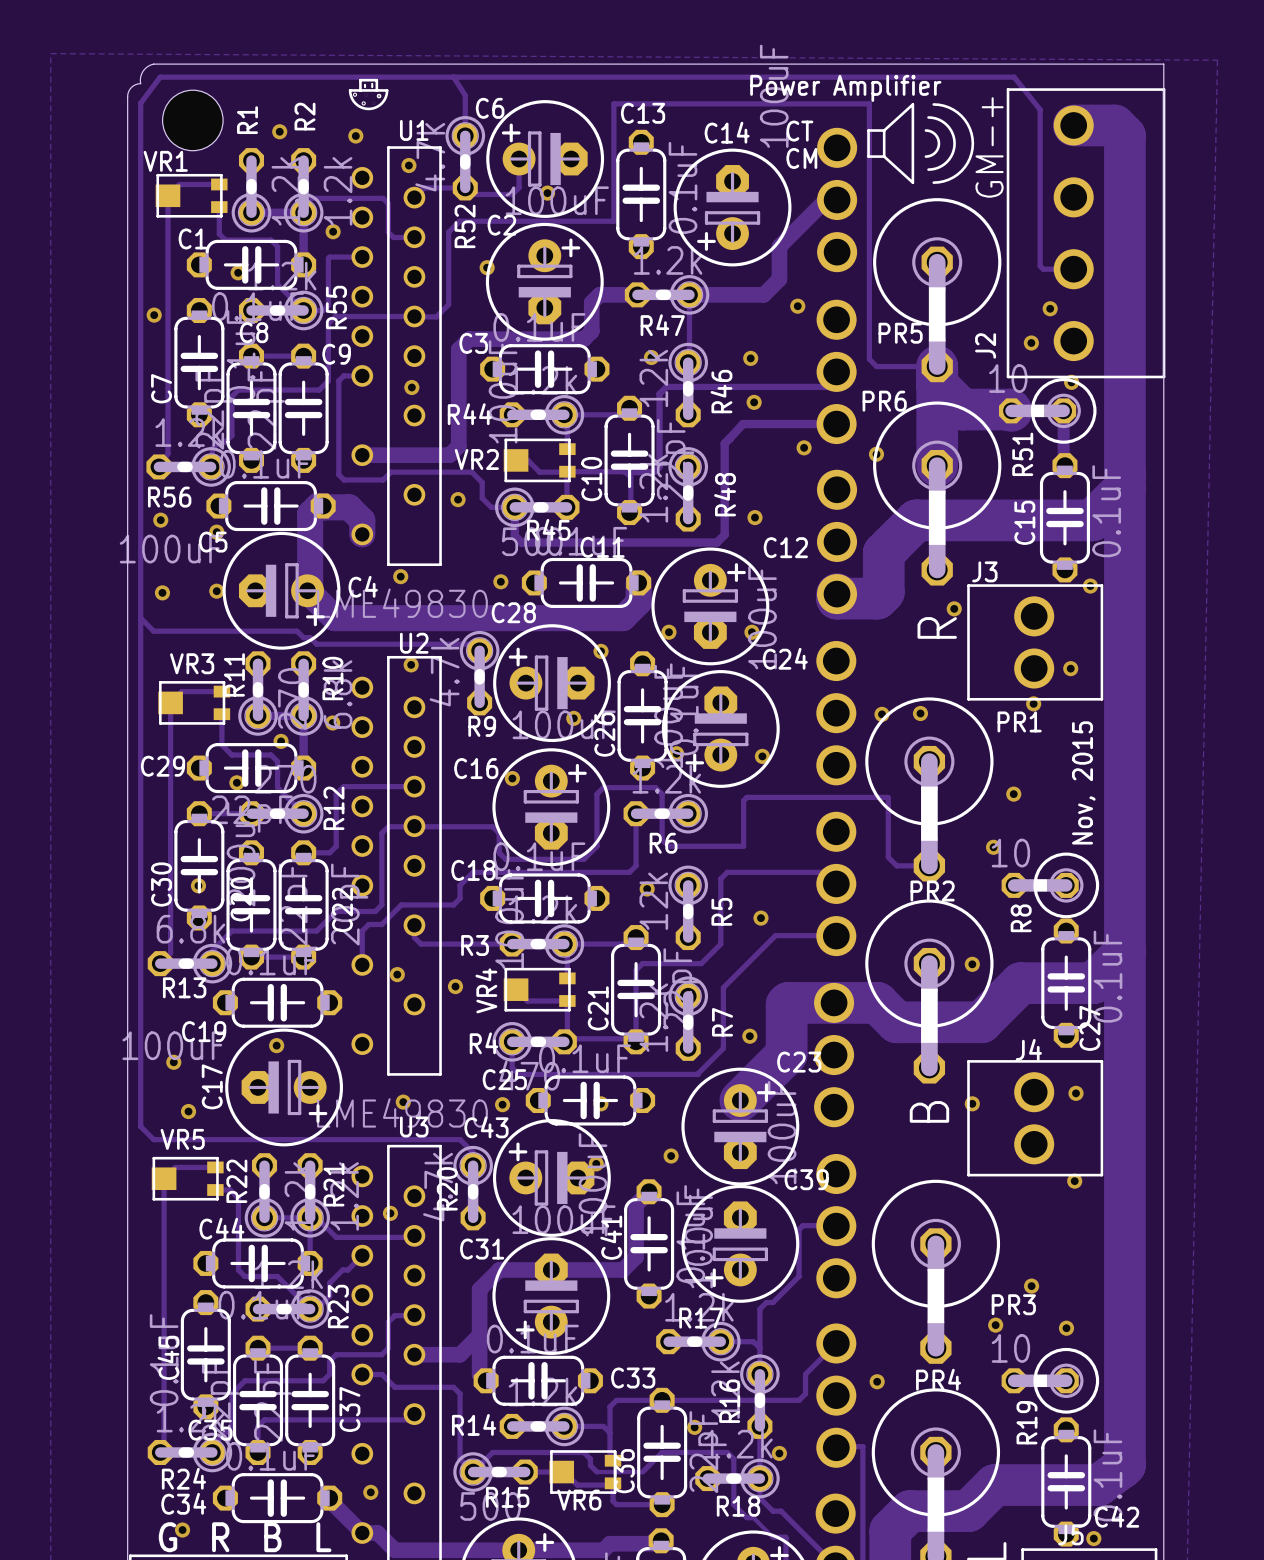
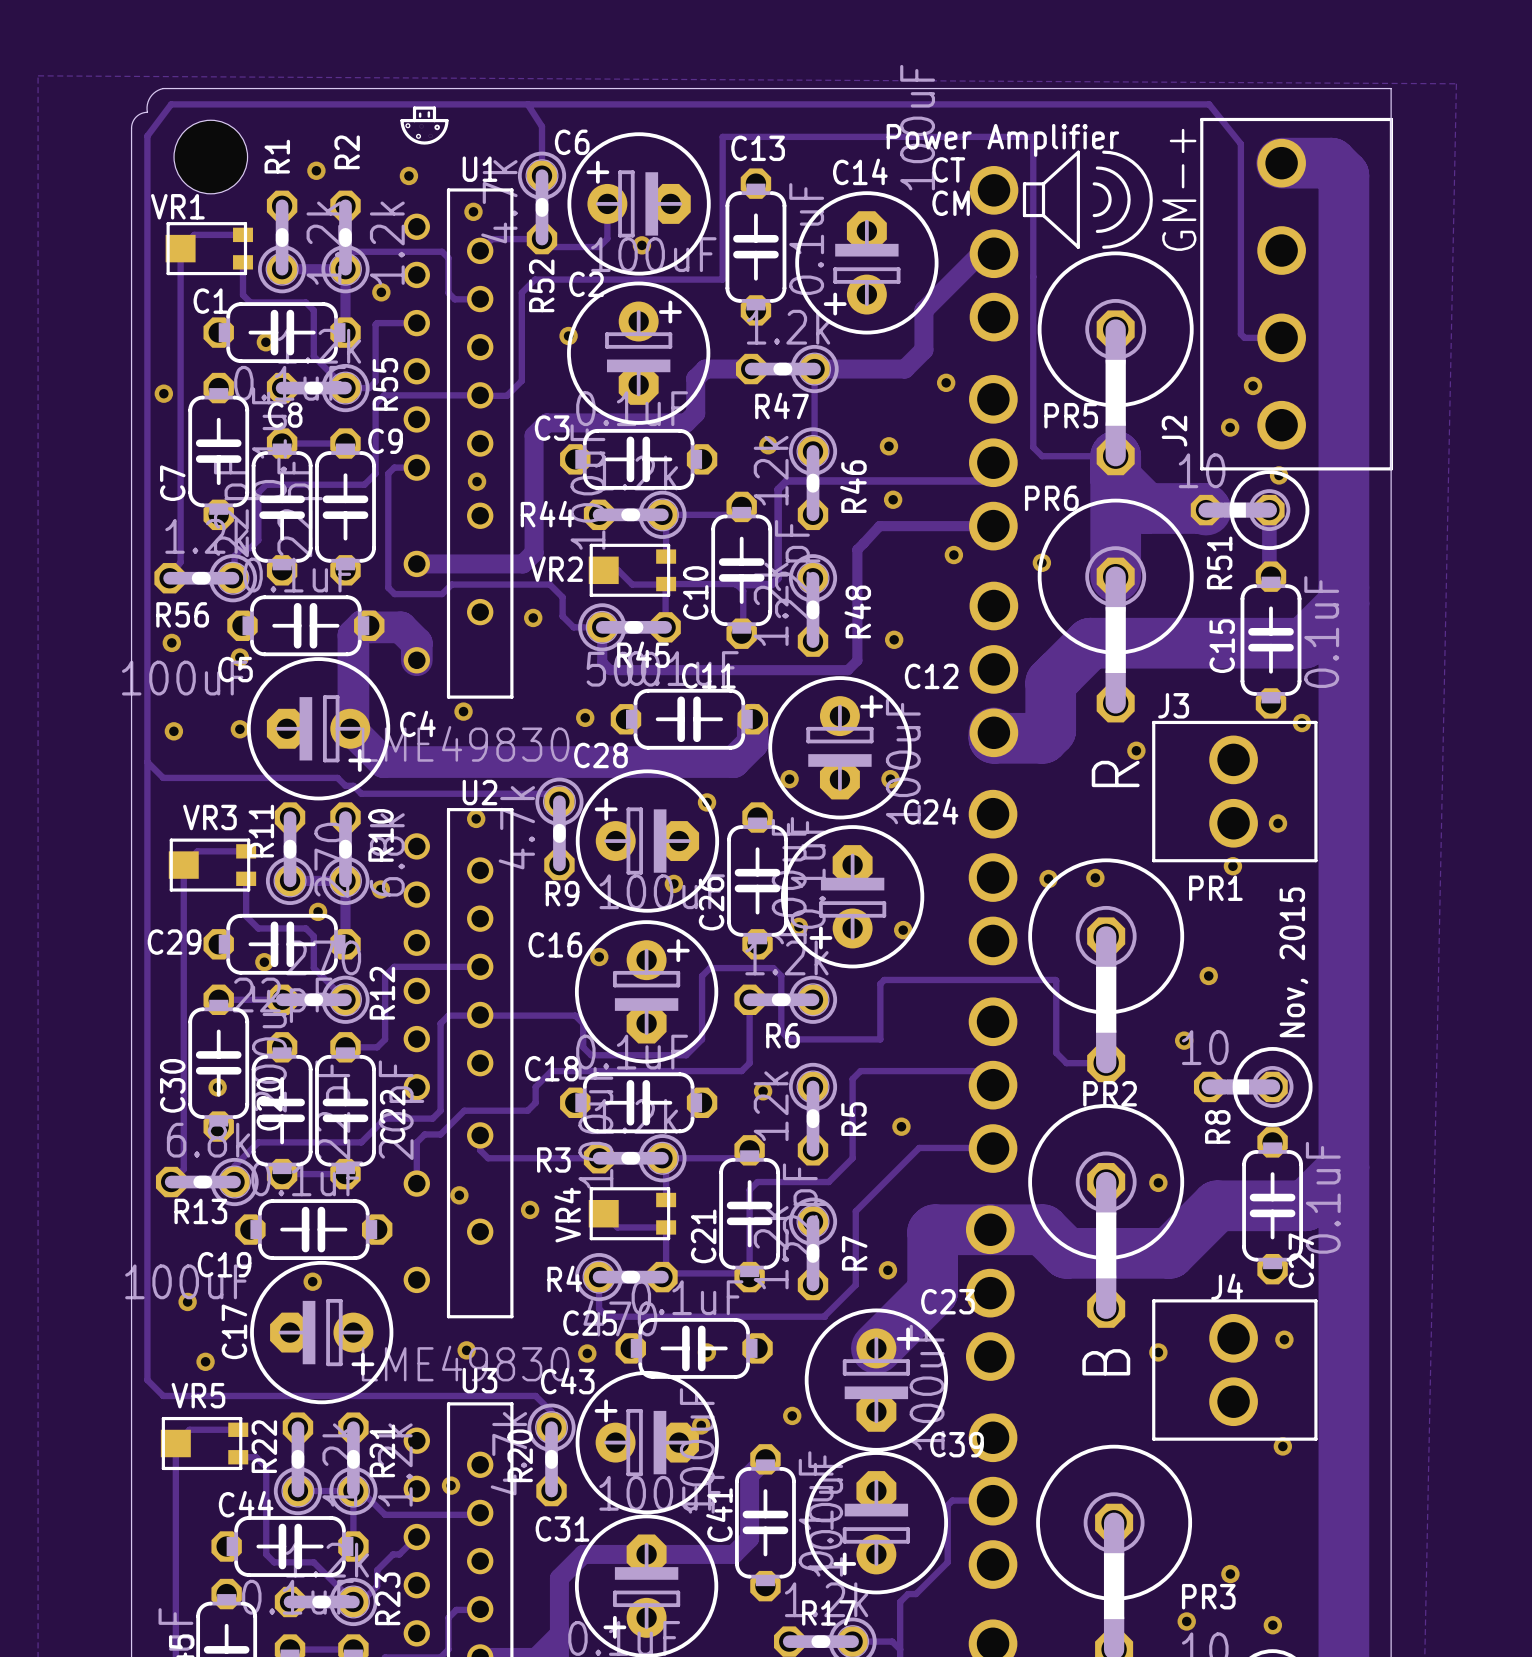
text position: Power Amplifier (845, 88) -> Power Amplifier (1002, 140)
drawing position: (920, 143) -> (1087, 199)

